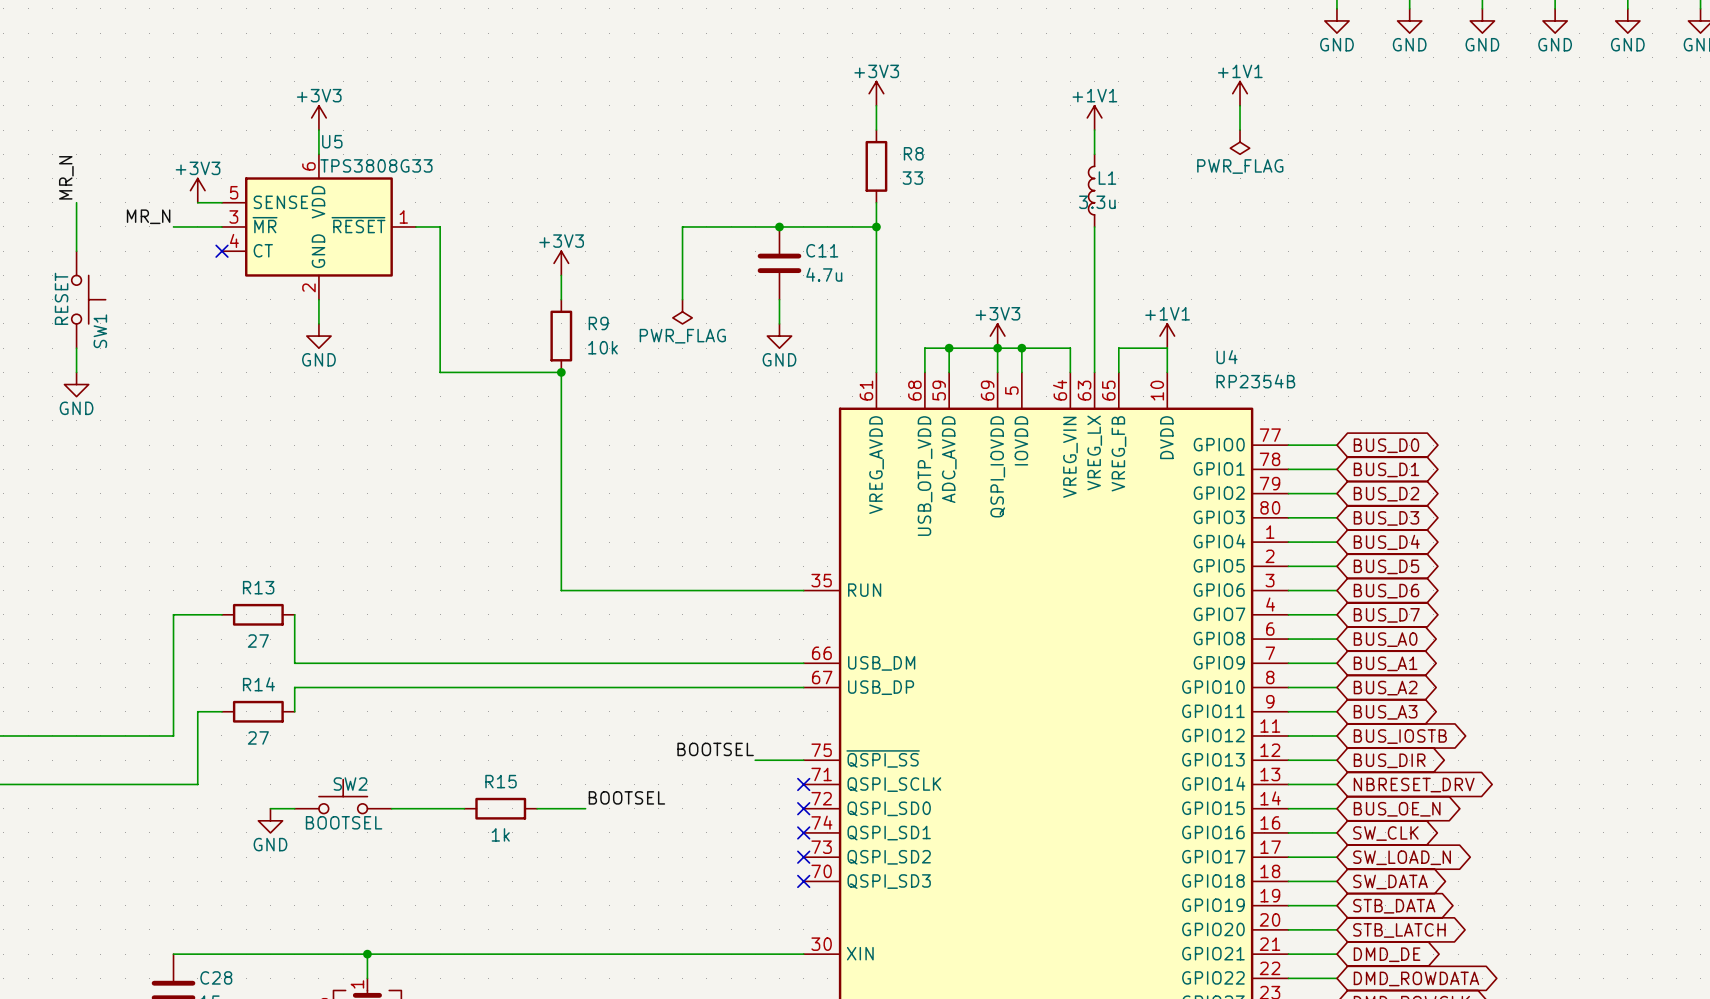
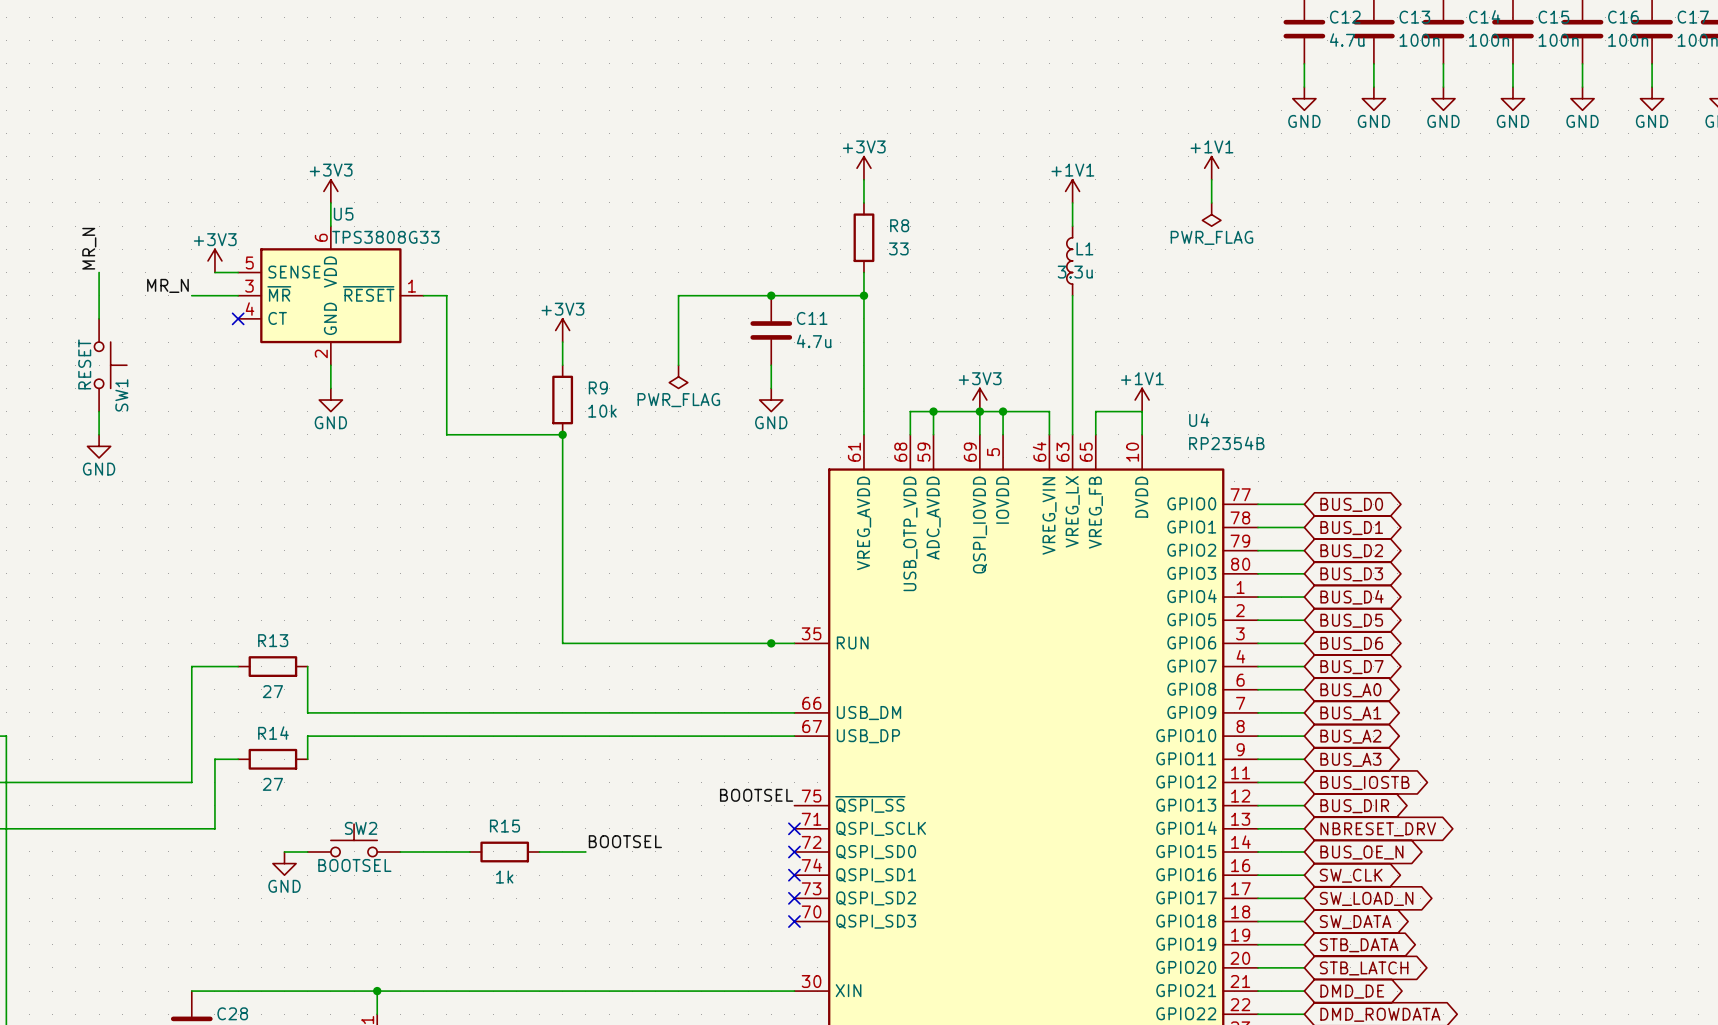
junction: none -> (771, 643)
label position: BOOTSEL (715, 749) -> BOOTSEL (756, 795)
wire: (755, 760) (803, 760) -> none

